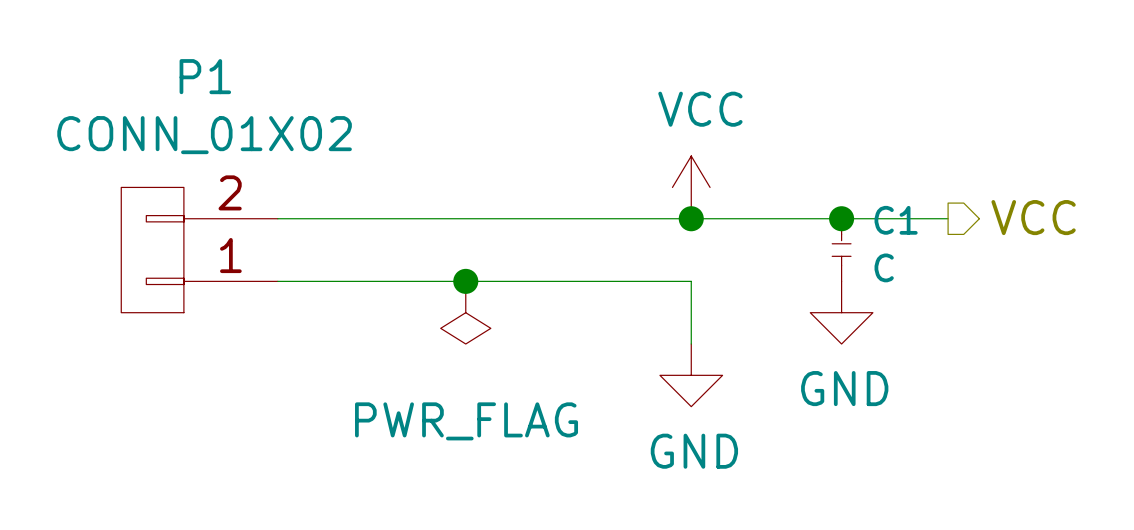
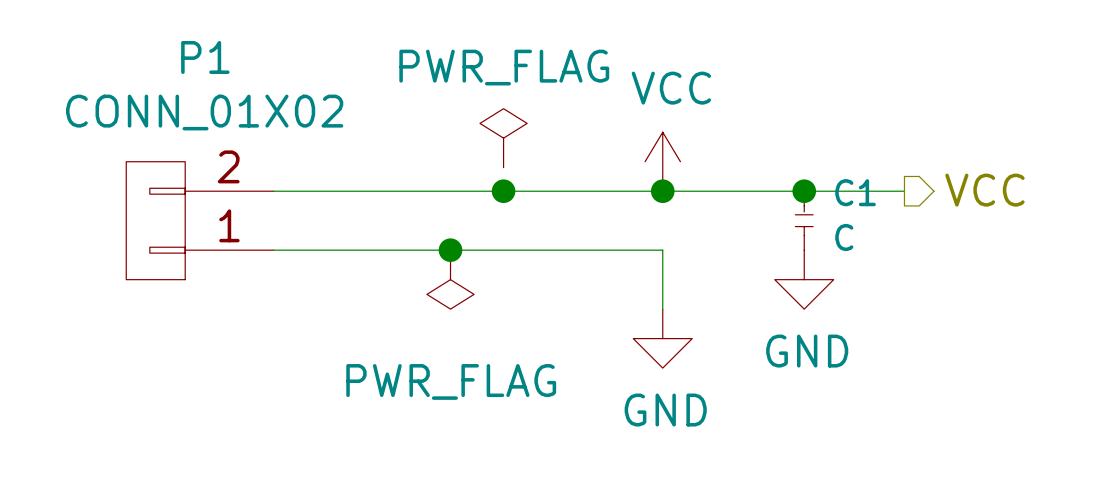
power symbol: none -> PWR_FLAG (503, 138)
junction: none -> (503, 191)

